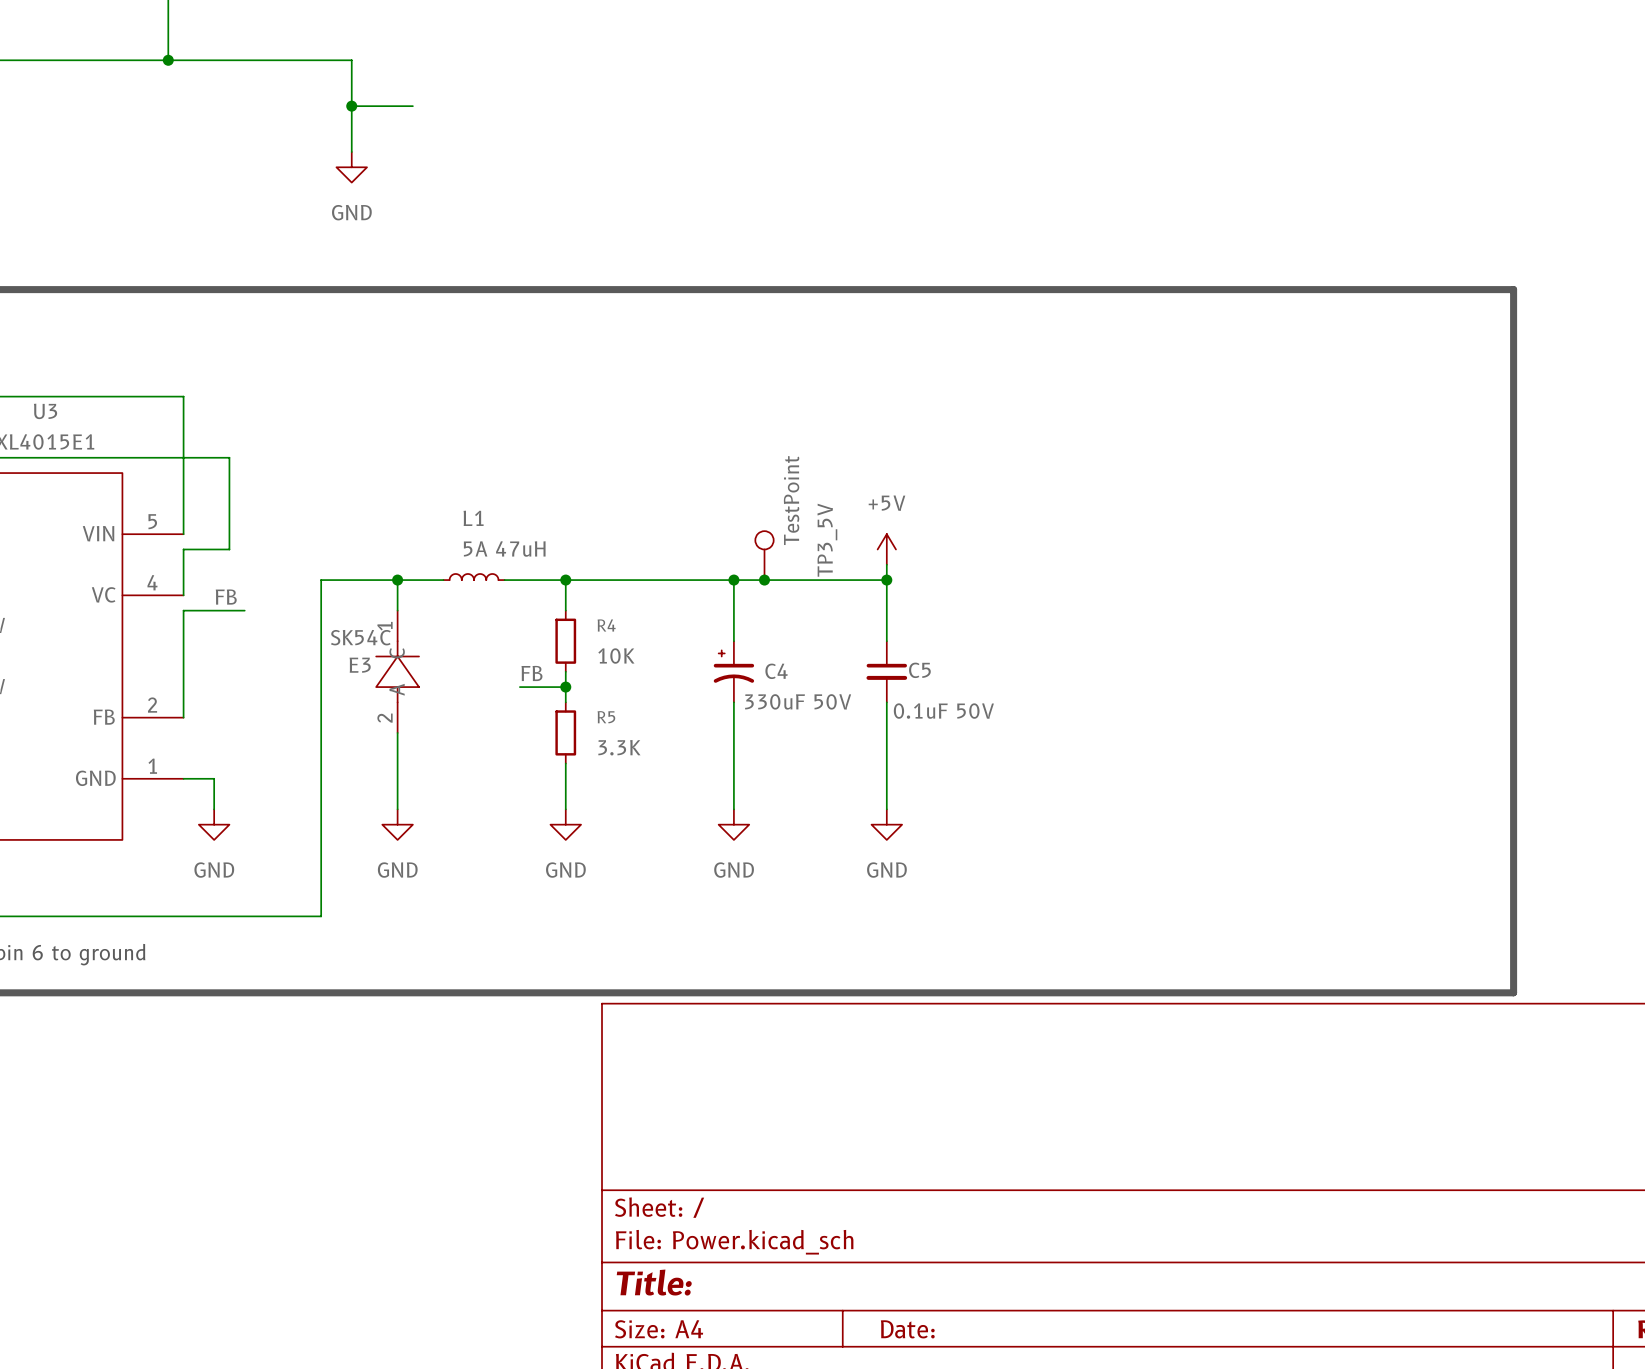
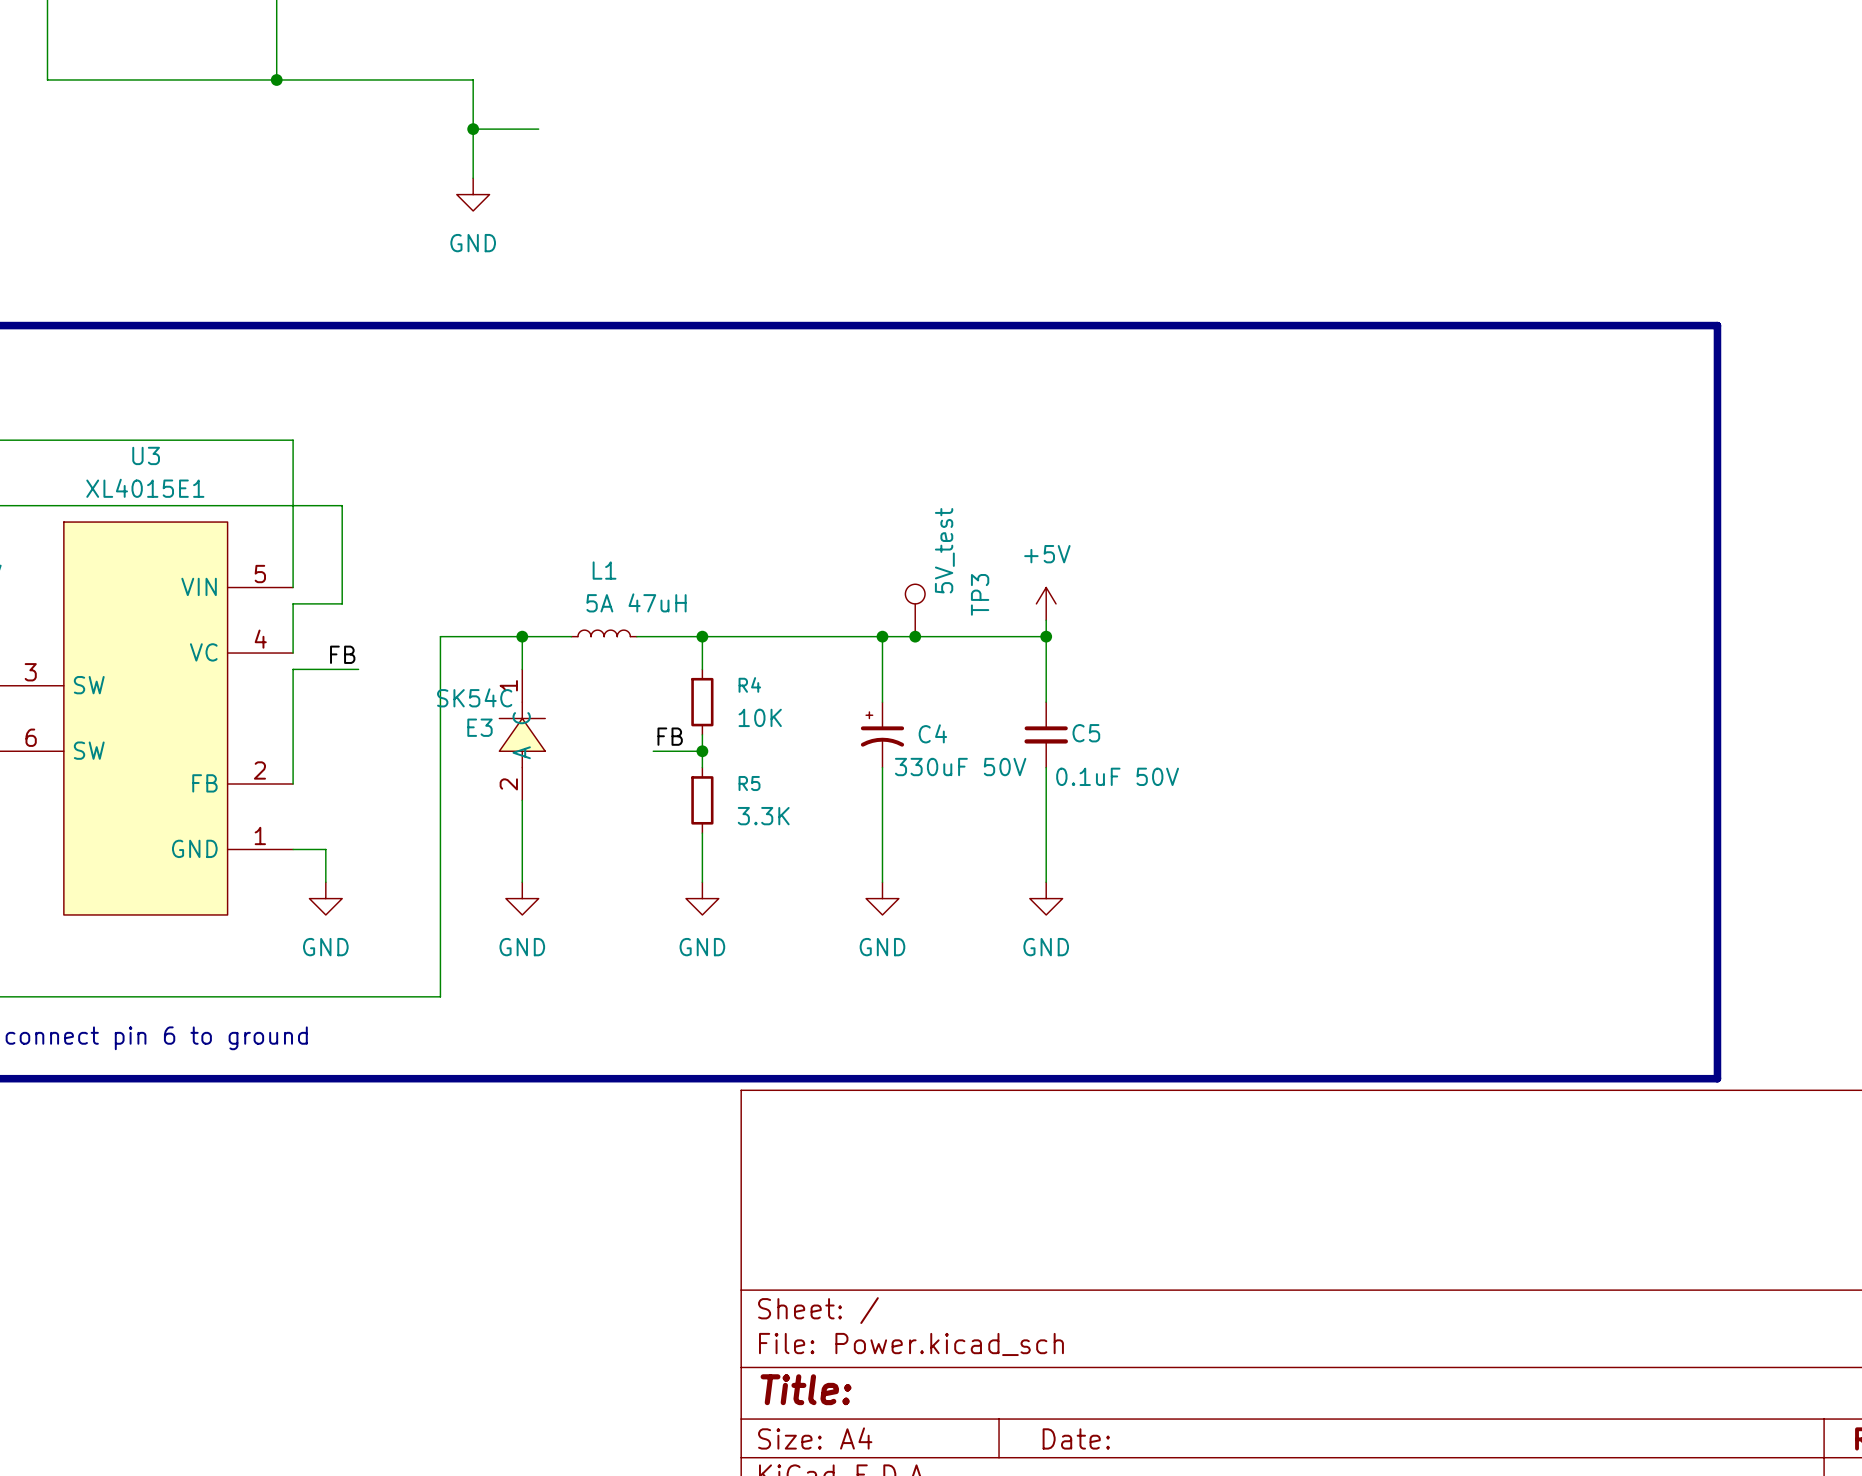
TP3_5V value: TestPoint (791, 500) -> 5V_test (944, 550)
TP3_5V name: TP3_5V (827, 540) -> TP3 (980, 594)

